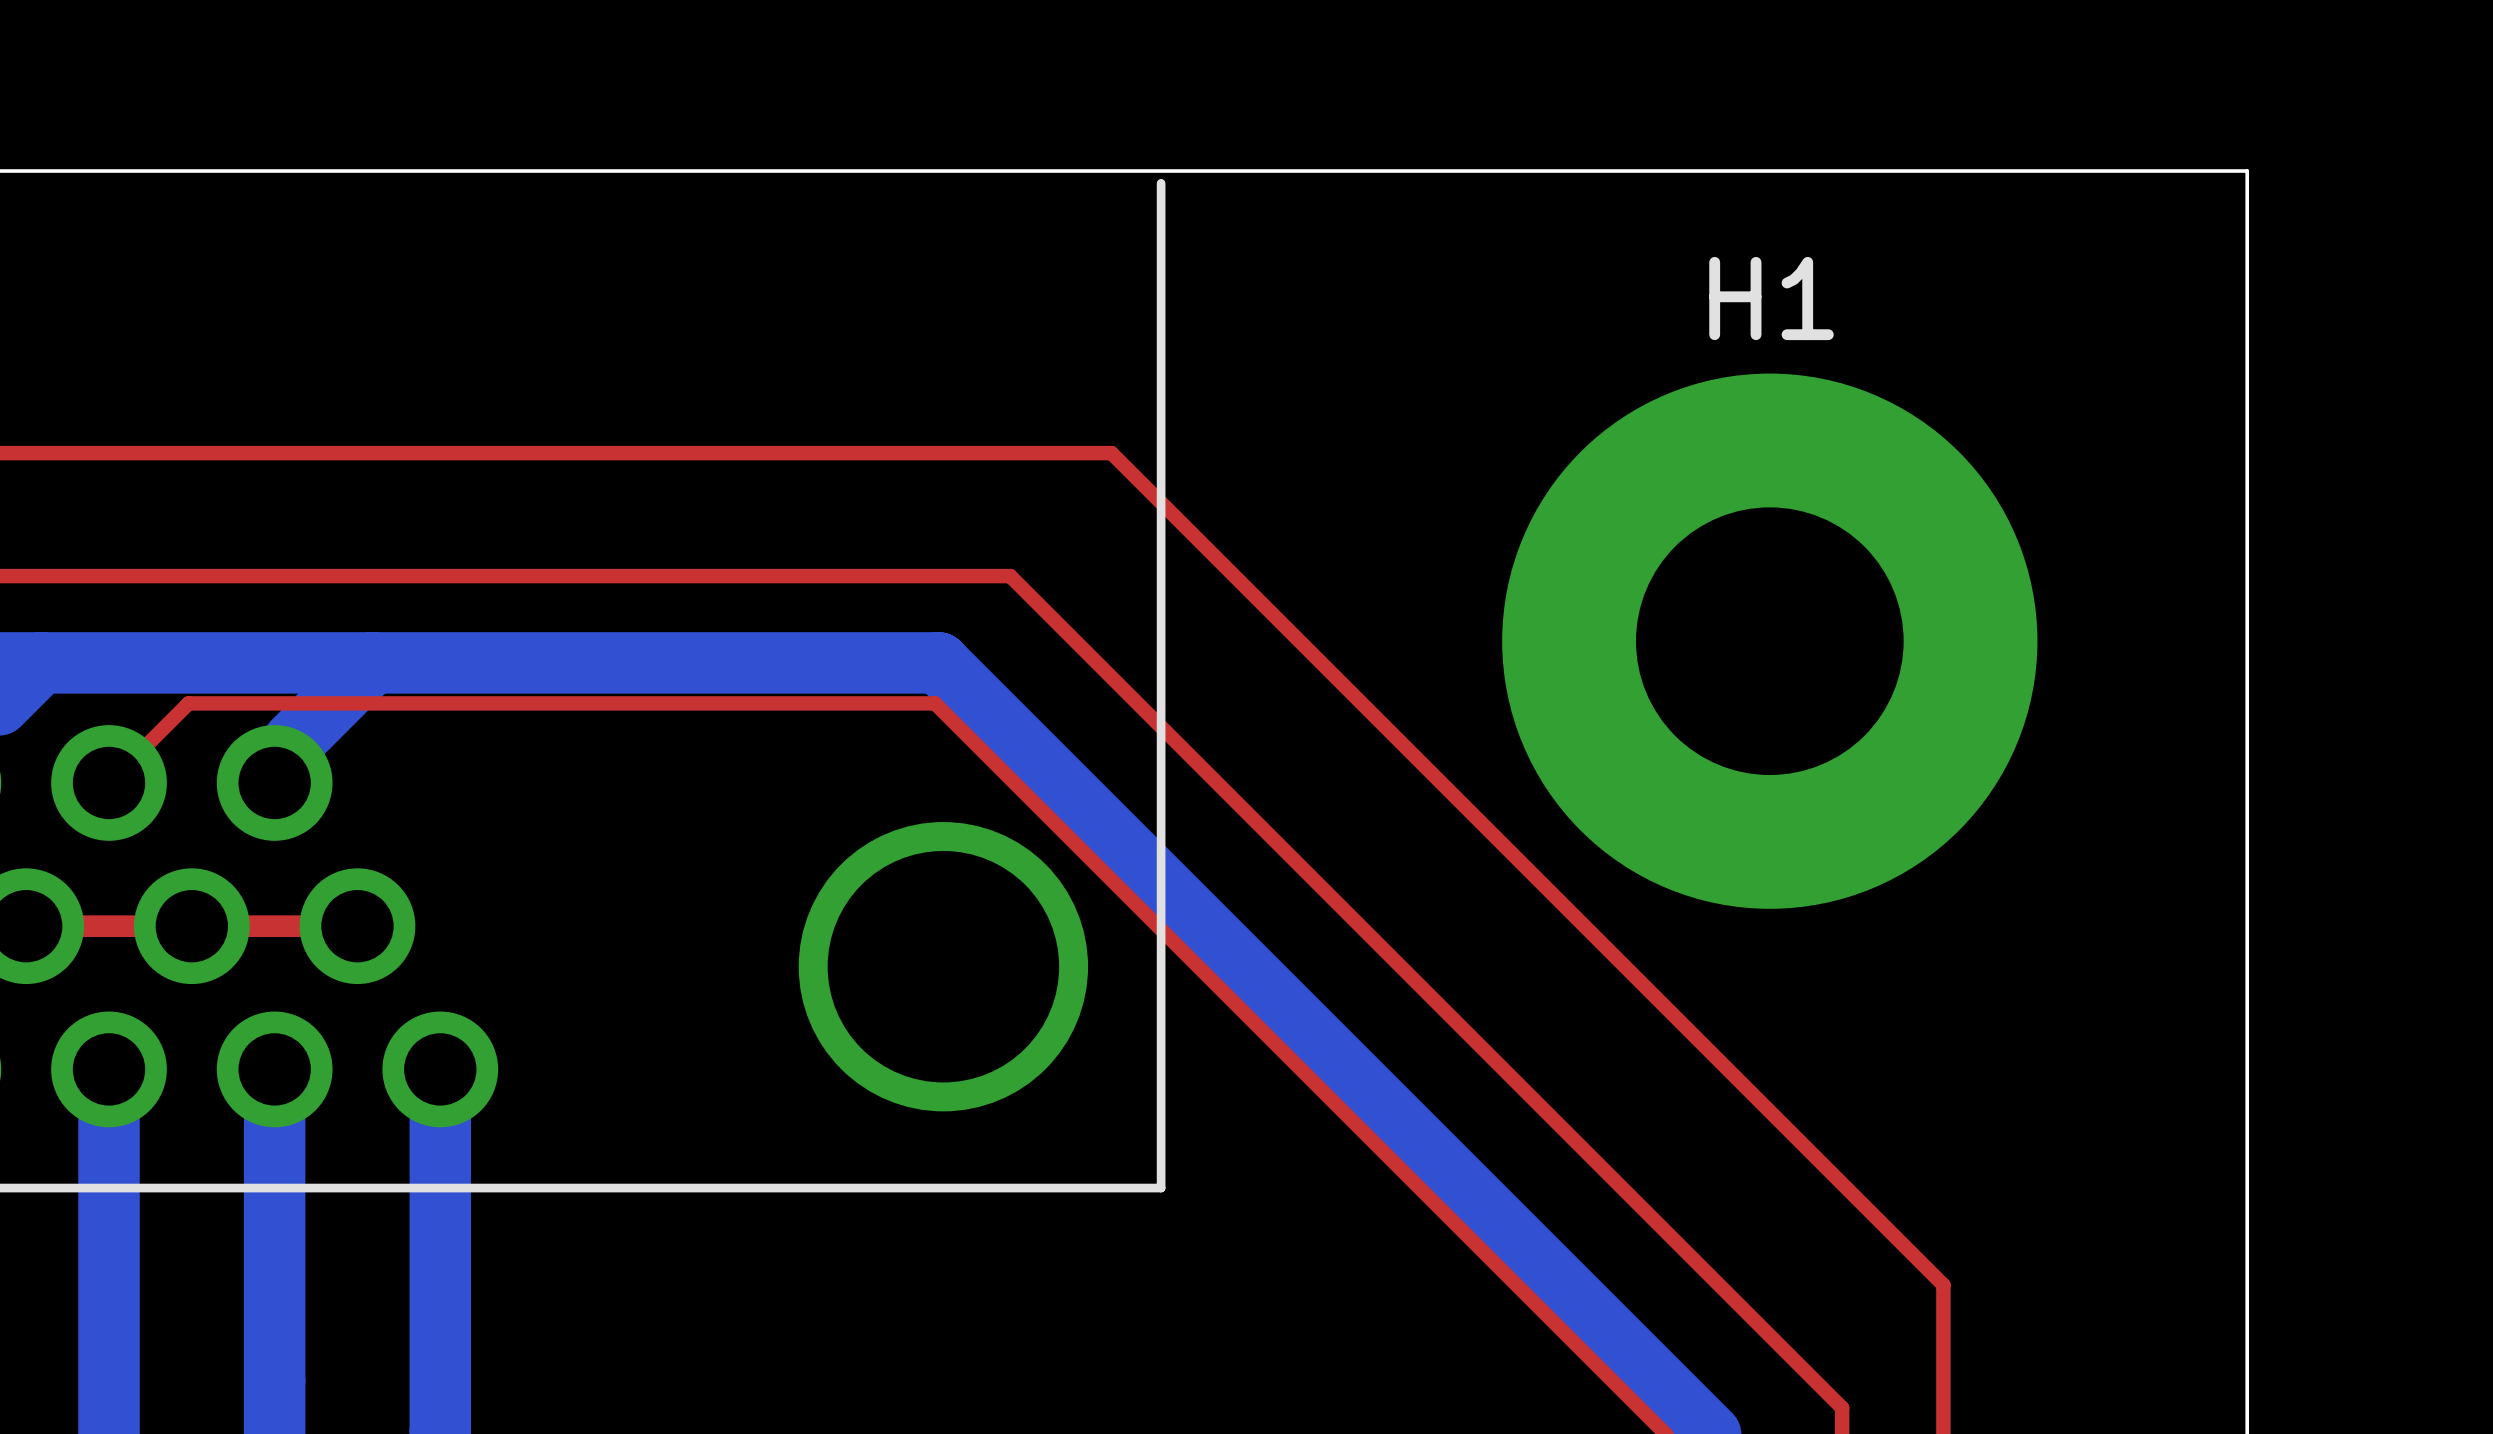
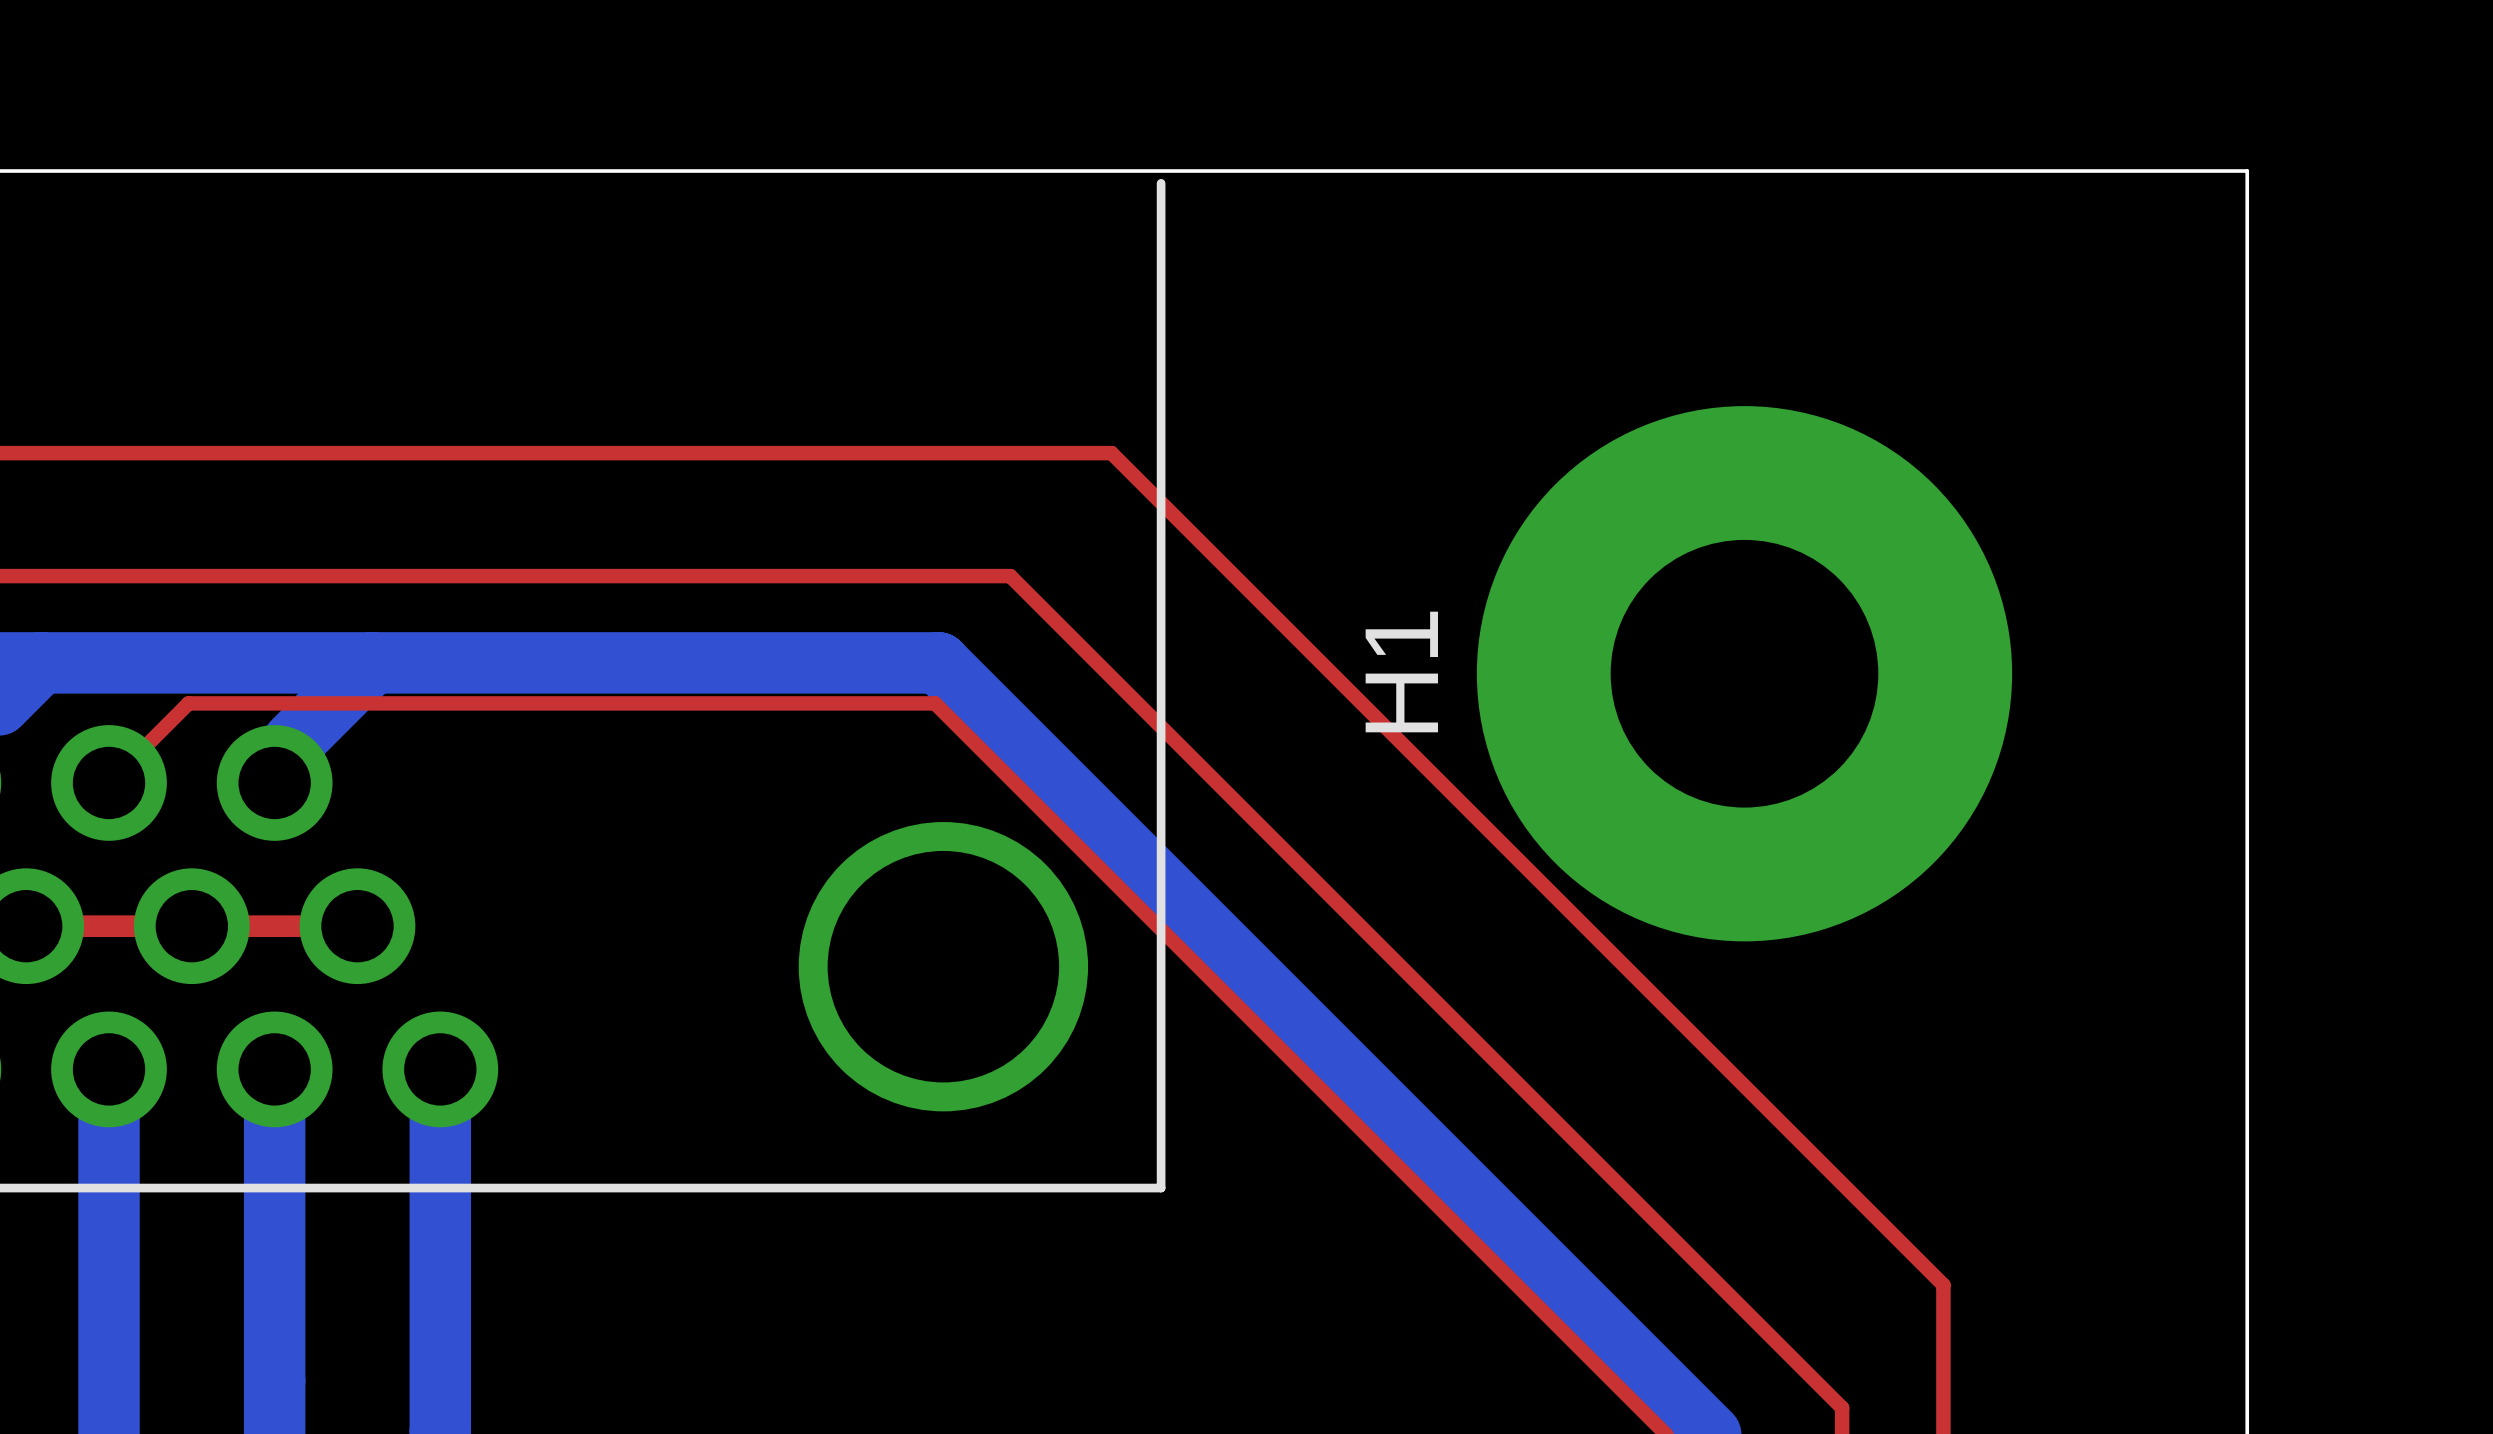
H1 name rotation: 0° (1771, 298) -> 90° counterclockwise (1401, 671)
H1 name position: H1 (1771, 298) -> H1 (1401, 671)
H1 position: (1769, 641) -> (1744, 673)

